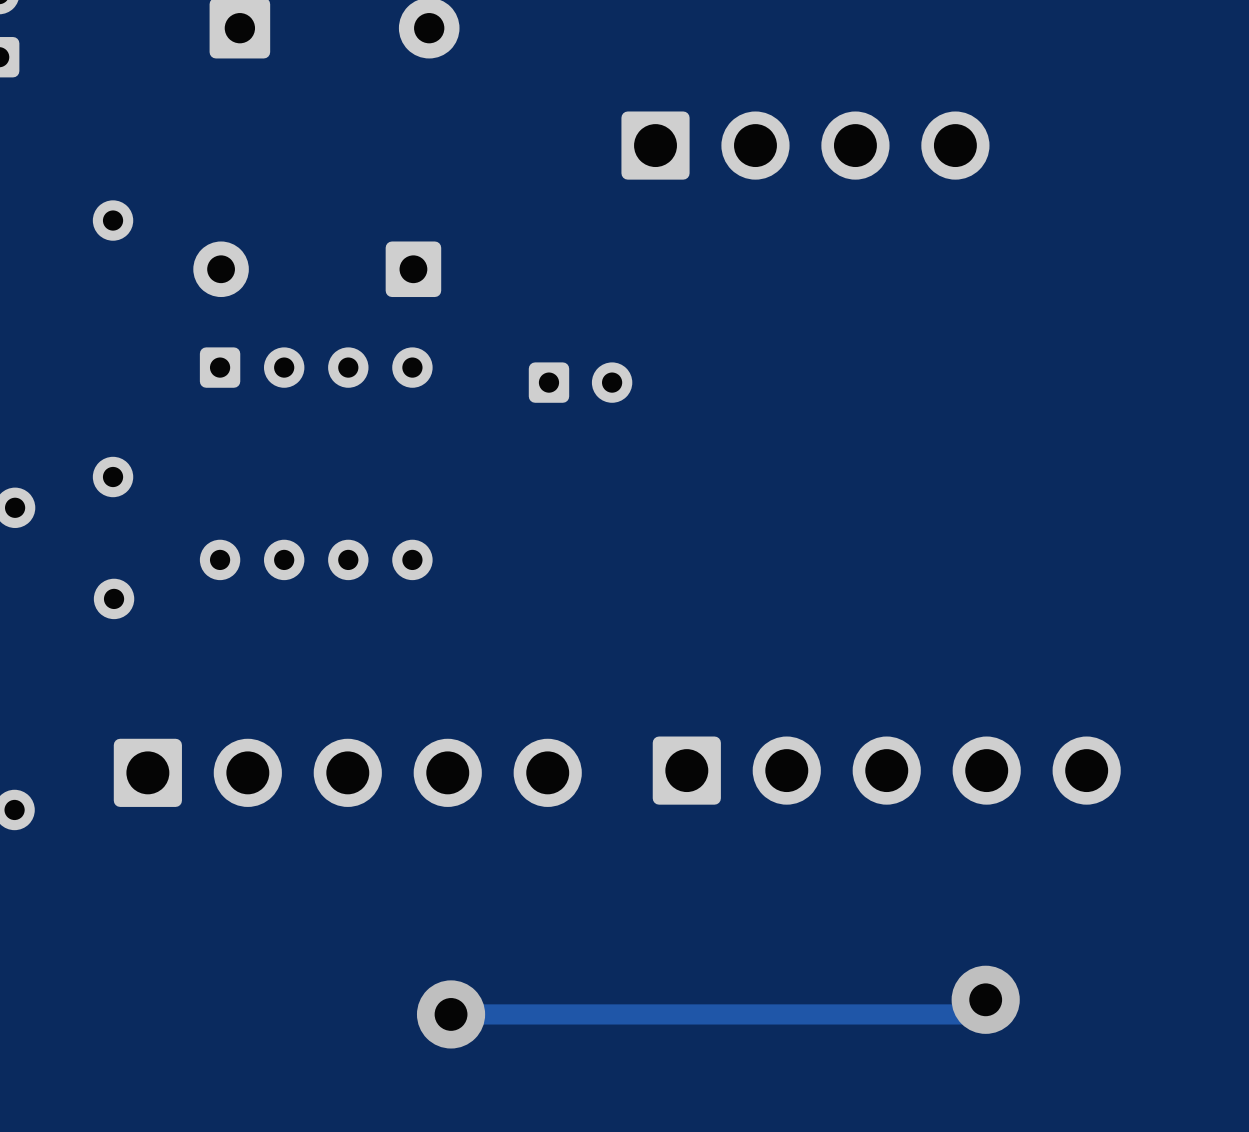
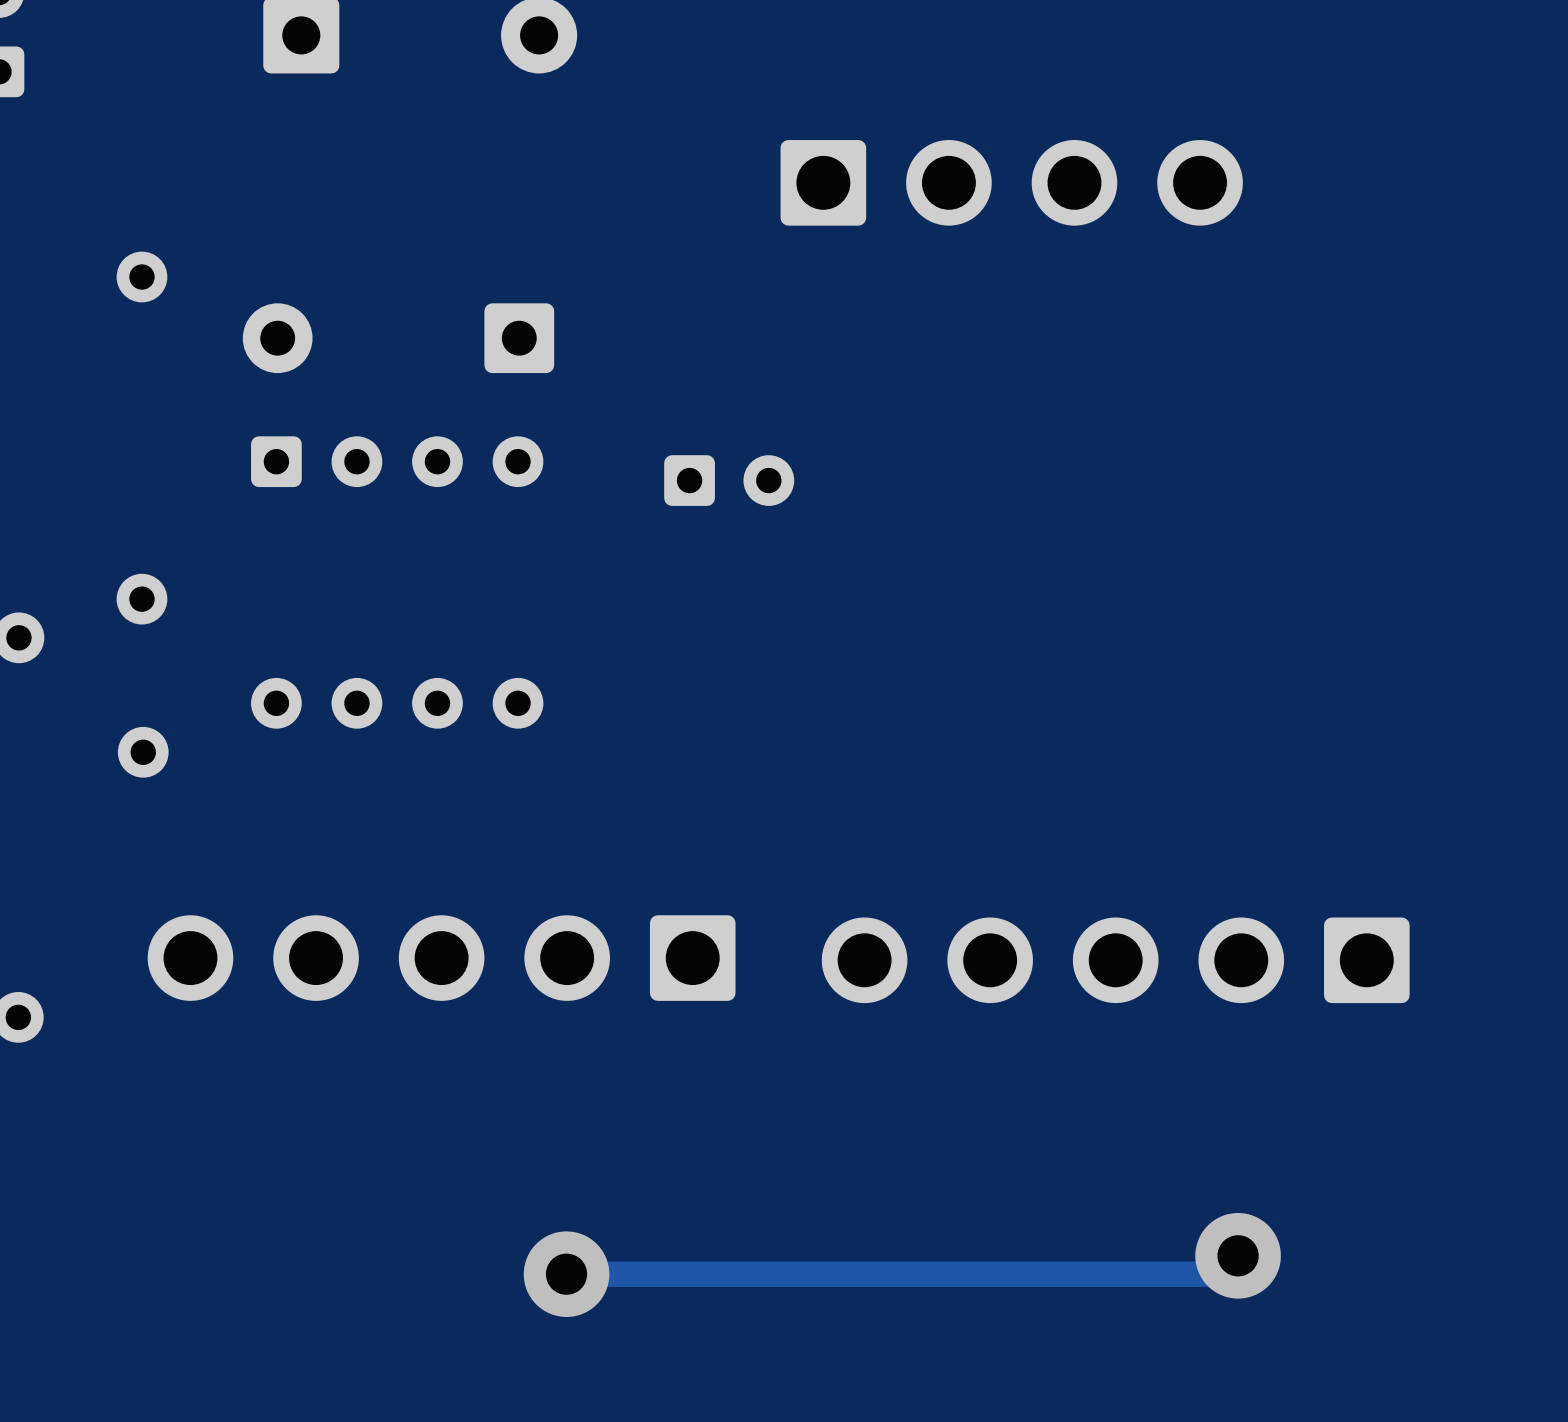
part rotation: 0° (886, 770) -> 180° (1115, 960)
part rotation: 0° (347, 772) -> 180° (441, 958)

